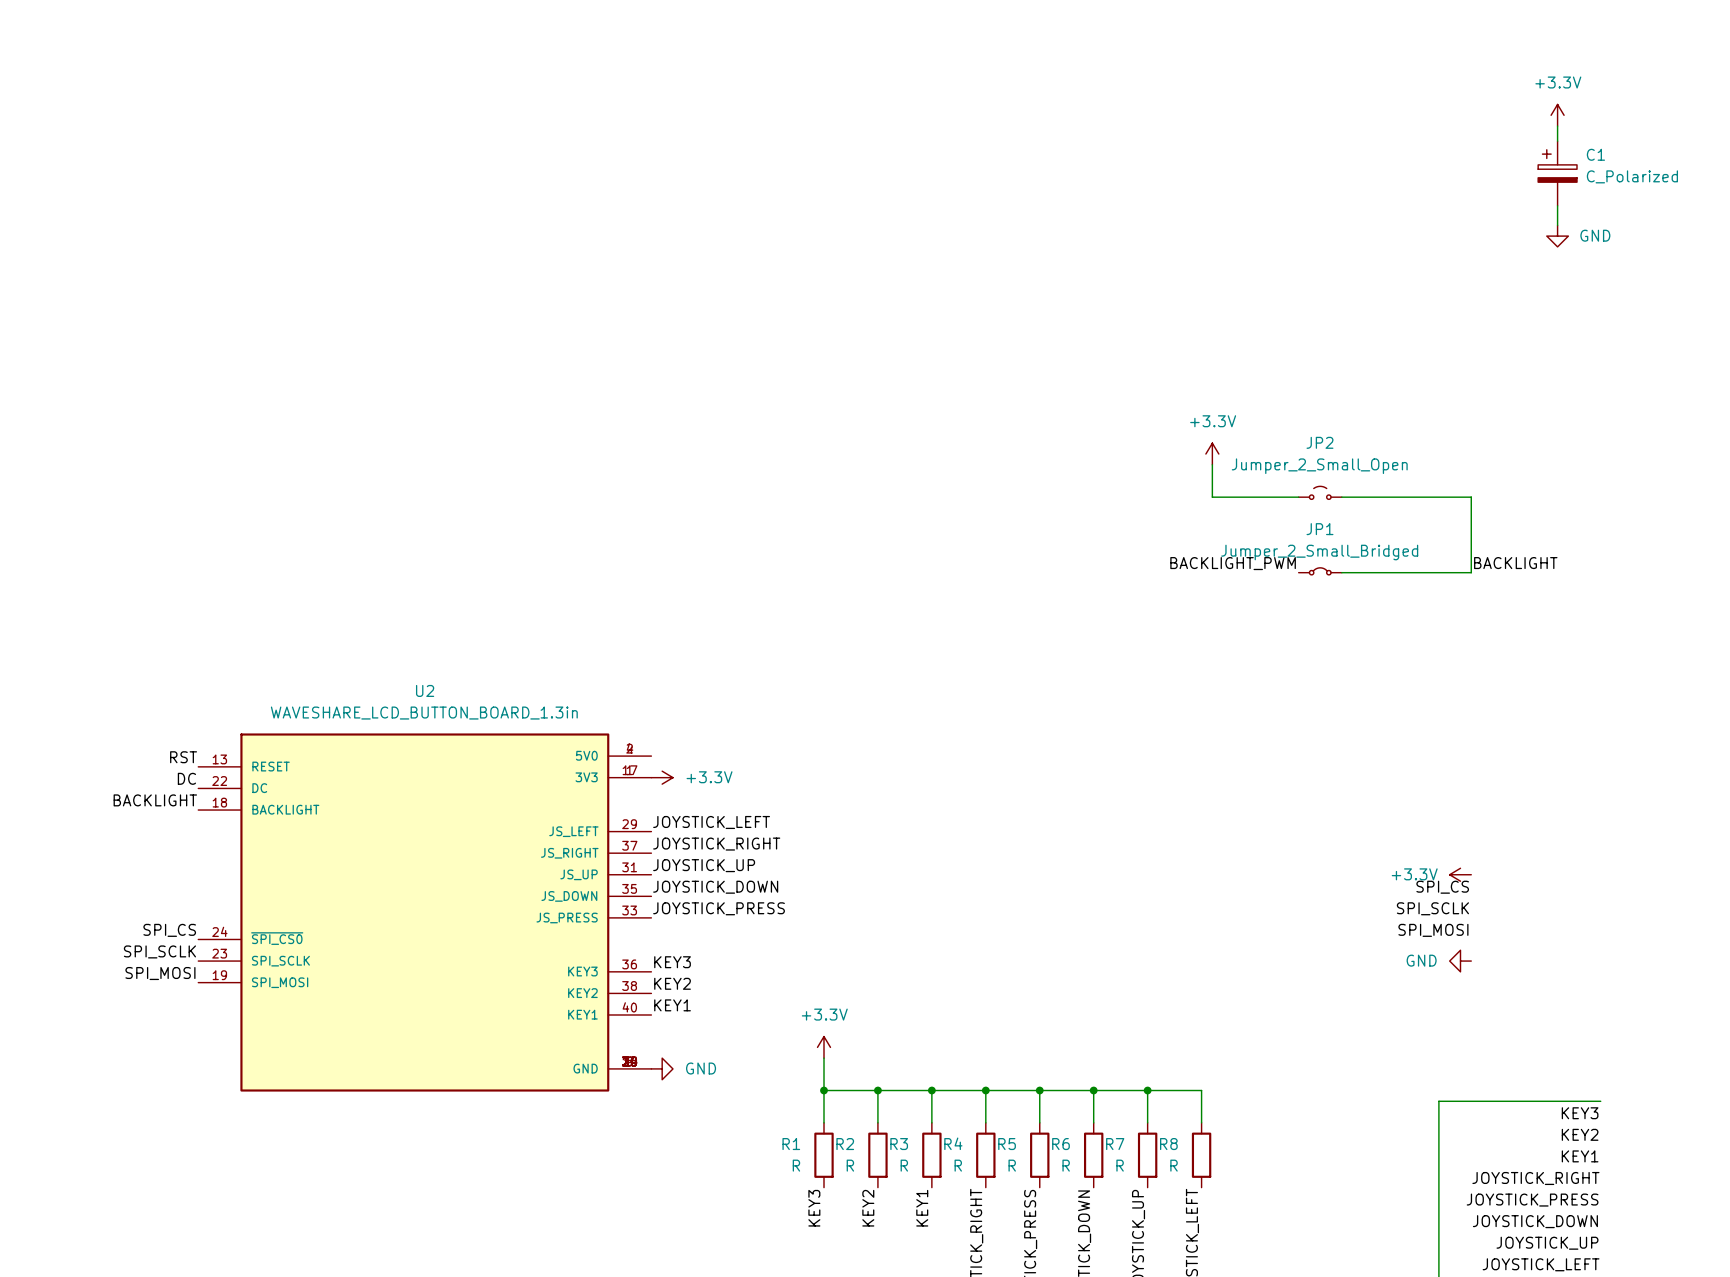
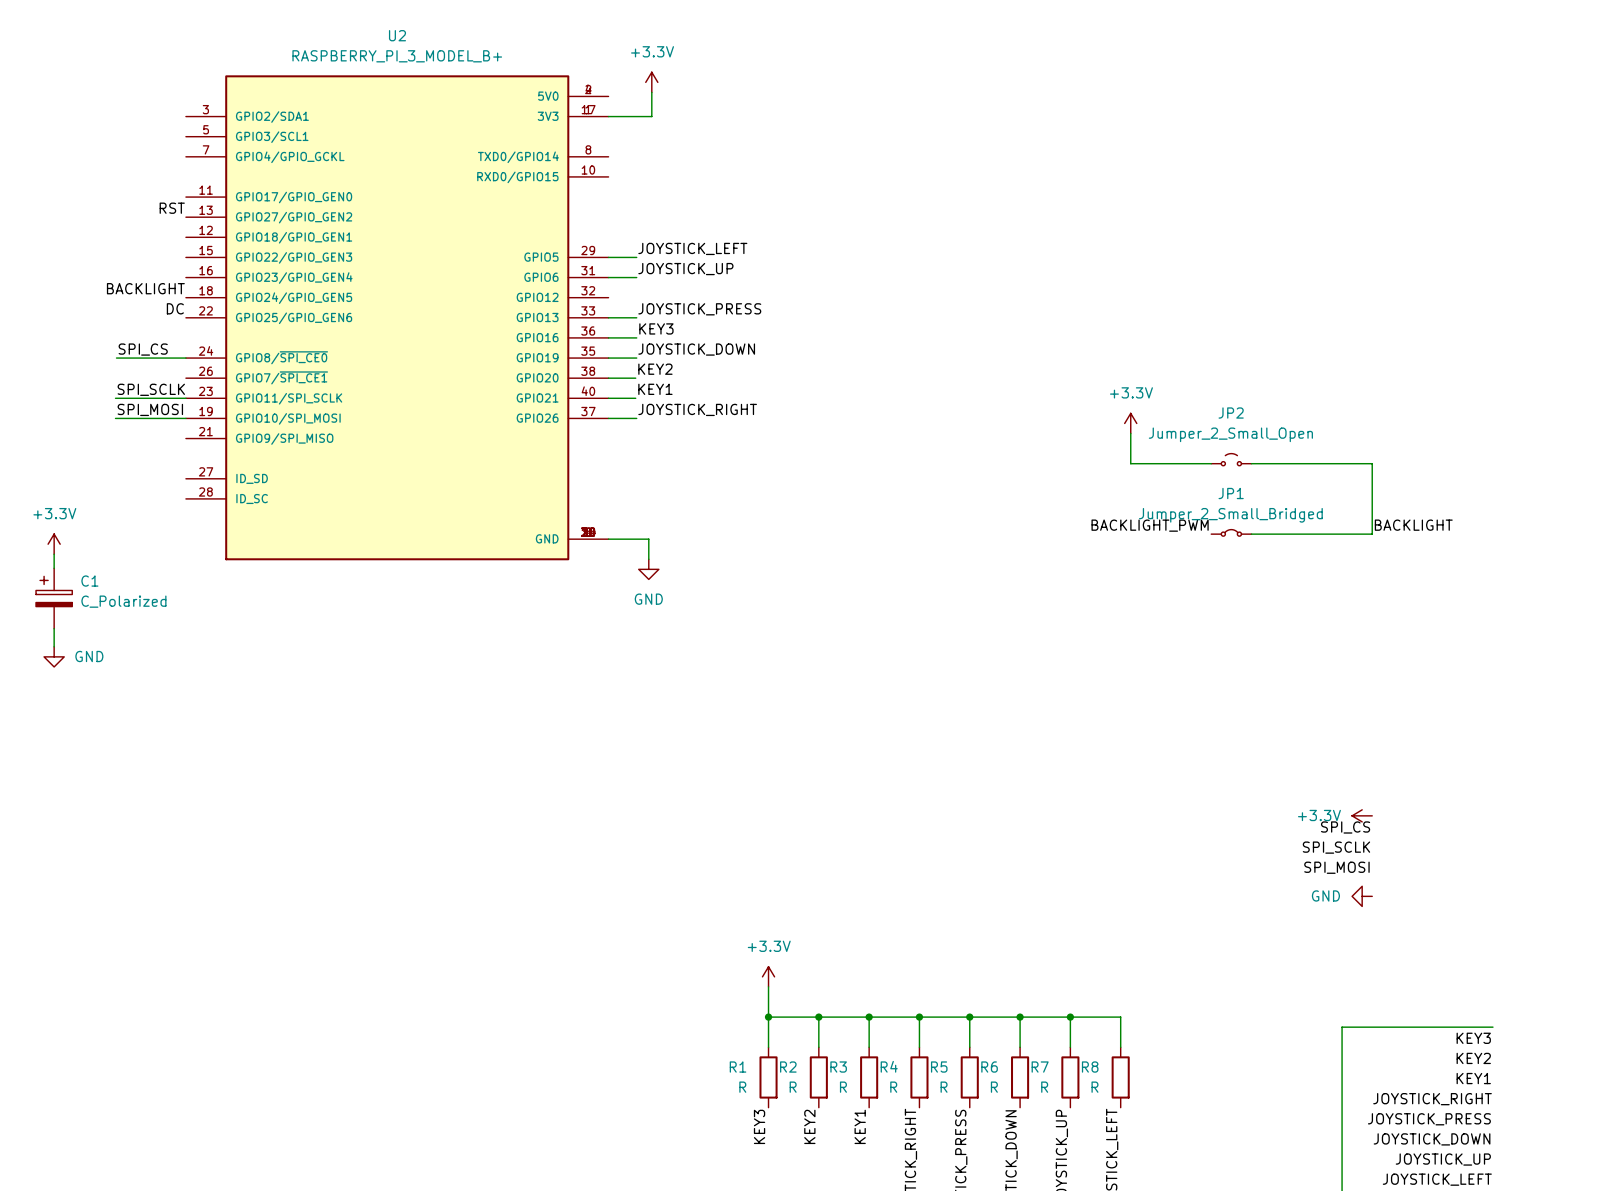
power symbol: none -> +3.3V (651, 82)
wire: none -> (651, 92) (651, 116) (608, 116)
power symbol: +3.3V (1557, 115) -> none
wire: (1557, 126) (1557, 141) -> none
C1 position: (1557, 173) -> (54, 598)
wire: (1557, 205) (1557, 225) -> none
label: none -> RST (172, 208)
power symbol: GND (1557, 236) -> none
label: none -> JOYSTICK_LEFT (692, 248)
wire: none -> (608, 257) (636, 257)
label: none -> JOYSTICK_UP (685, 269)
wire: none -> (608, 277) (636, 277)
label: none -> BACKLIGHT (145, 288)
label: none -> DC (175, 308)
label: none -> JOYSTICK_PRESS (699, 309)
wire: none -> (608, 317) (636, 317)
label: none -> KEY3 (656, 328)
wire: none -> (608, 337) (636, 337)
label: none -> SPI_CS (143, 349)
label: none -> JOYSTICK_DOWN (696, 349)
wire: none -> (116, 358) (185, 358)
wire: none -> (608, 358) (636, 358)
label: none -> KEY2 (655, 369)
wire: none -> (608, 378) (635, 378)
label: none -> SPI_SCLK (151, 389)
label: none -> KEY1 (655, 389)
wire: none -> (115, 398) (185, 398)
wire: none -> (608, 398) (635, 398)
label: none -> SPI_MOSI (150, 409)
label: none -> JOYSTICK_RIGHT (697, 409)
wire: none -> (115, 418) (185, 418)
wire: none -> (608, 418) (636, 418)
wire: none -> (608, 539) (648, 539) (648, 559)
power symbol: none -> +3.3V (54, 544)
wire: none -> (54, 554) (54, 568)
power symbol: none -> GND (648, 569)
wire: none -> (54, 628) (54, 646)
U2 name position: U2 (425, 690) -> U2 (397, 35)
power symbol: none -> GND (54, 656)
U2 value: WAVESHARE_LCD_BUTTON_BOARD_1.3in (424, 713) -> RASPBERRY_PI_3_MODEL_B+ (397, 56)
U2 symbol: [198, 733, 652, 1092] -> [185, 75, 609, 561]
label: RST (183, 757) -> none
power symbol: +3.3V (662, 777) -> none
label: DC (186, 778) -> none
label: BACKLIGHT (155, 800) -> none
label: JOYSTICK_LEFT (711, 822) -> none
label: JOYSTICK_RIGHT (716, 844) -> none
label: JOYSTICK_UP (704, 865) -> none
label: JOYSTICK_DOWN (715, 887) -> none
label: JOYSTICK_PRESS (719, 908) -> none
label: SPI_CS (169, 930) -> none
label: SPI_SCLK (159, 951) -> none
label: KEY3 (672, 962) -> none
label: SPI_MOSI (160, 973) -> none
label: KEY2 (672, 983) -> none
label: KEY1 (672, 1005) -> none
power symbol: GND (662, 1068) -> none

